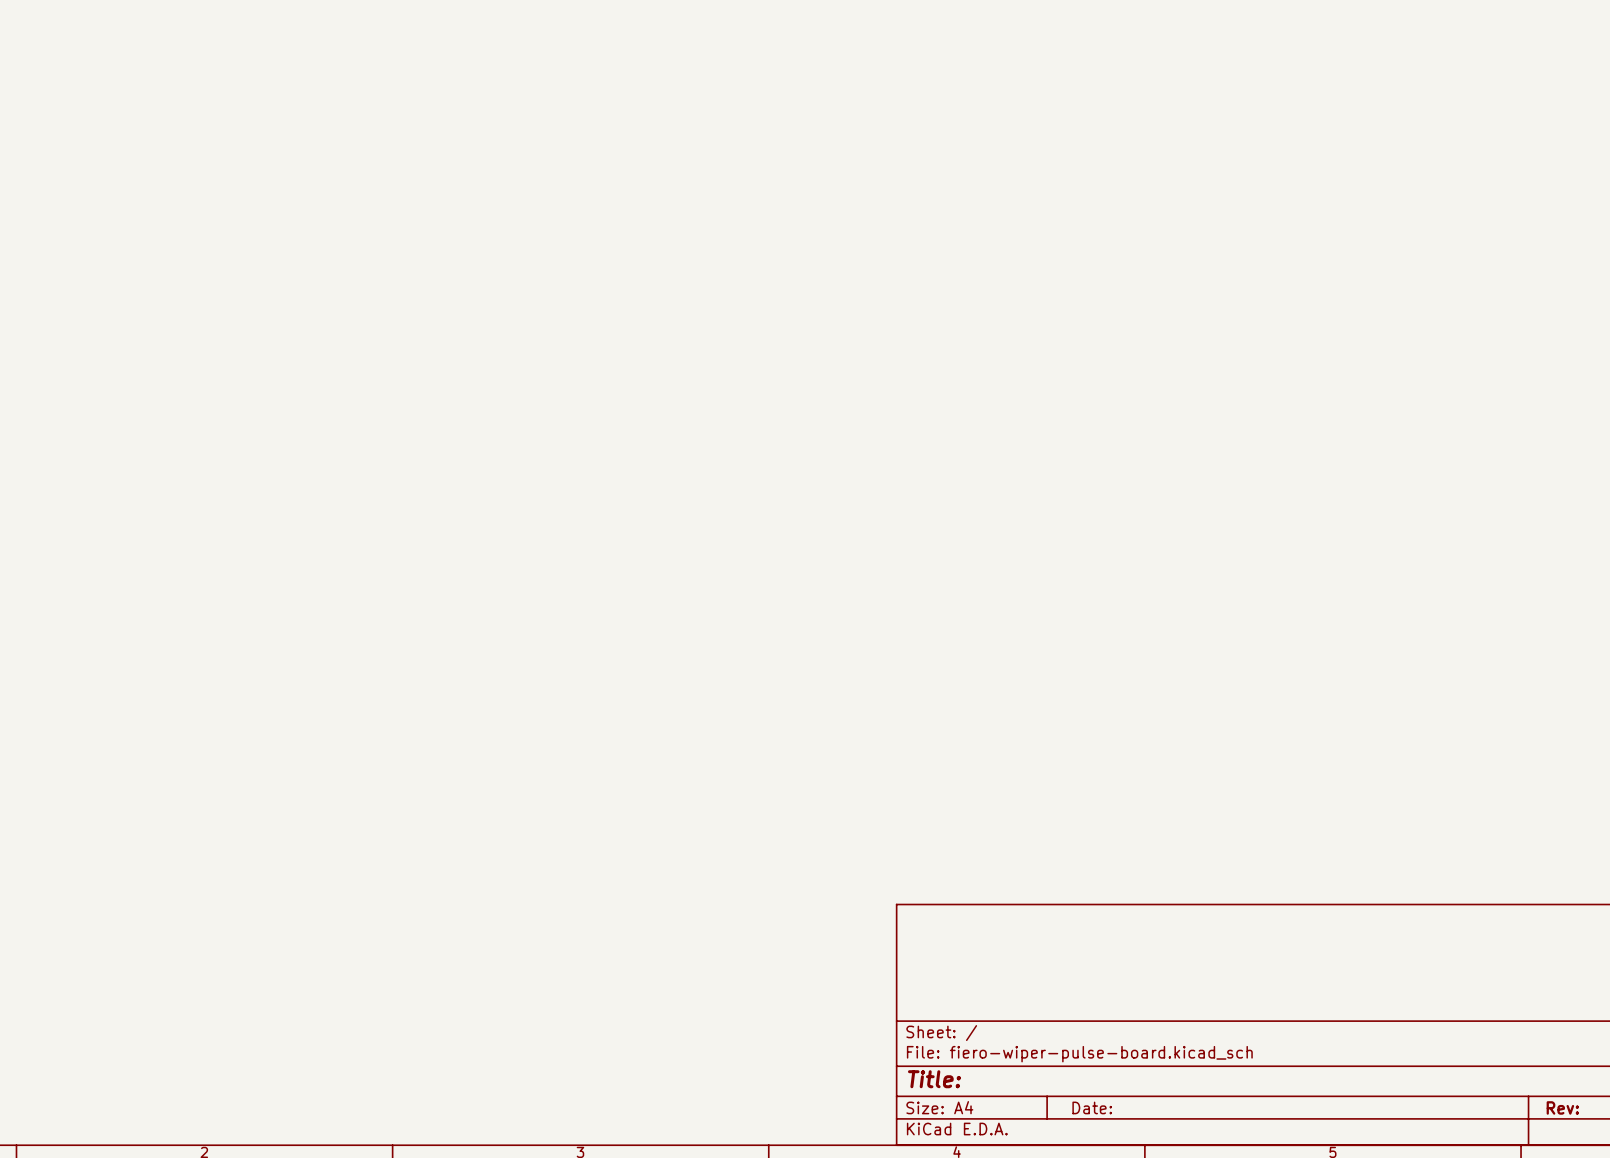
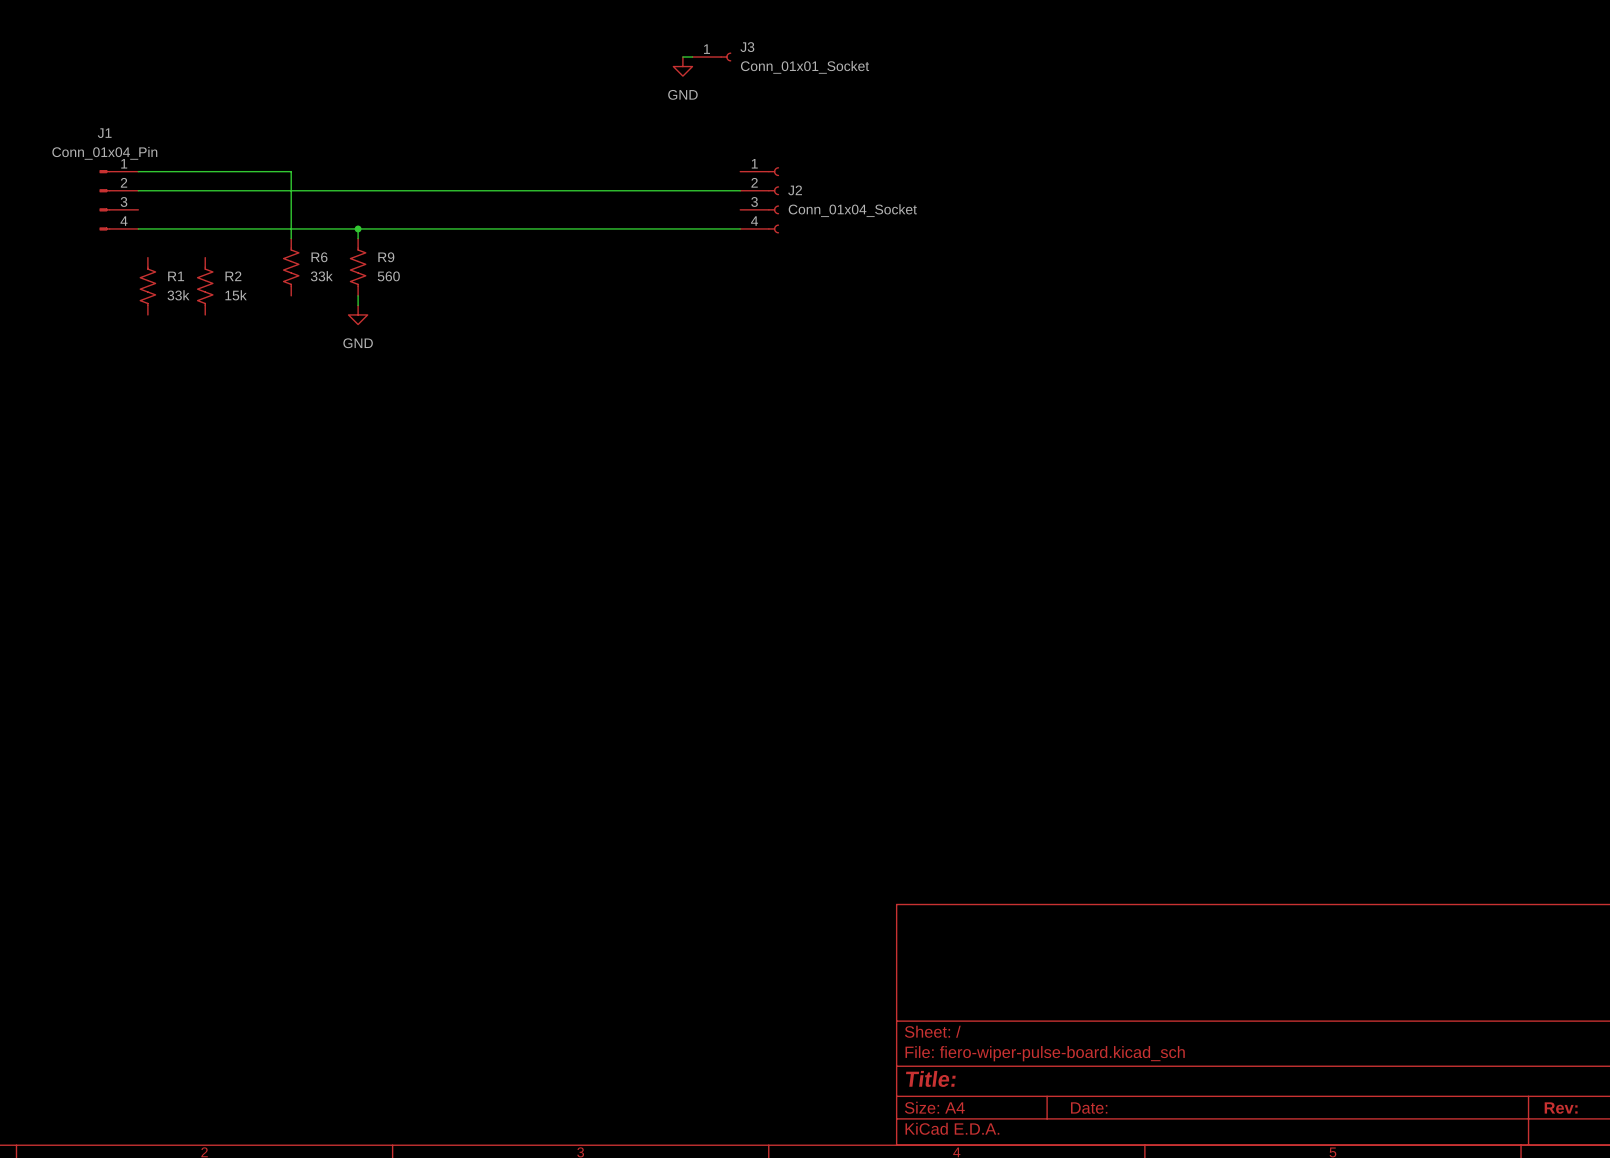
wire: none -> (682, 57) (692, 57)
J3: none -> Conn_01x01_Socket (711, 57)
power symbol: none -> GND (682, 66)
wire: none -> (138, 171) (291, 171) (291, 238)
wire: none -> (138, 190) (740, 190)
J1: none -> Conn_01x04_Pin (118, 200)
J2: none -> Conn_01x04_Socket (759, 200)
wire: none -> (138, 228) (740, 228)
wire: none -> (358, 228) (358, 238)
junction: none -> (358, 228)
R6: none -> 33k (291, 267)
R9: none -> 560 (358, 267)
R1: none -> 33k (147, 286)
R2: none -> 15k (205, 286)
wire: none -> (358, 295) (358, 305)
power symbol: none -> GND (358, 314)

